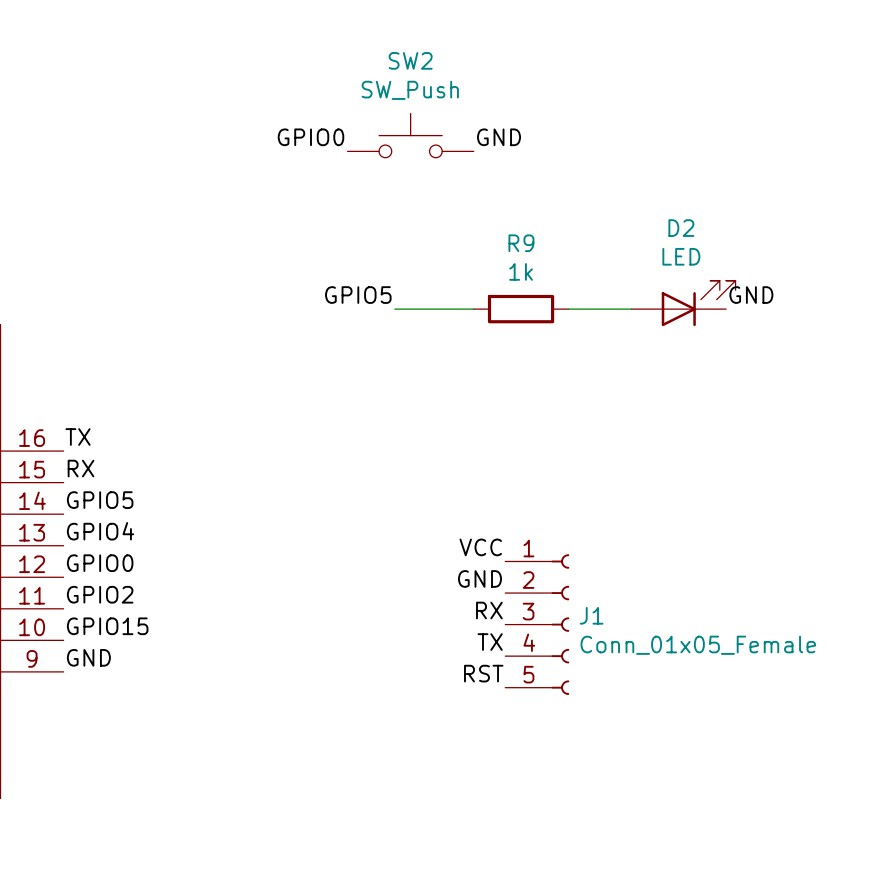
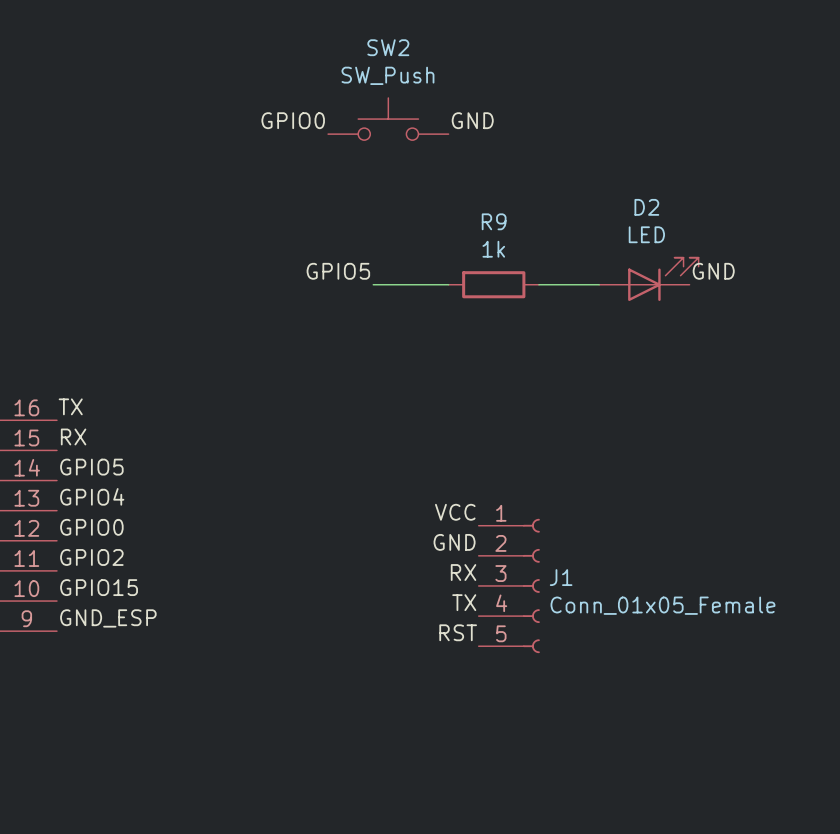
label: GND (88, 657) -> GND_ESP (108, 618)

